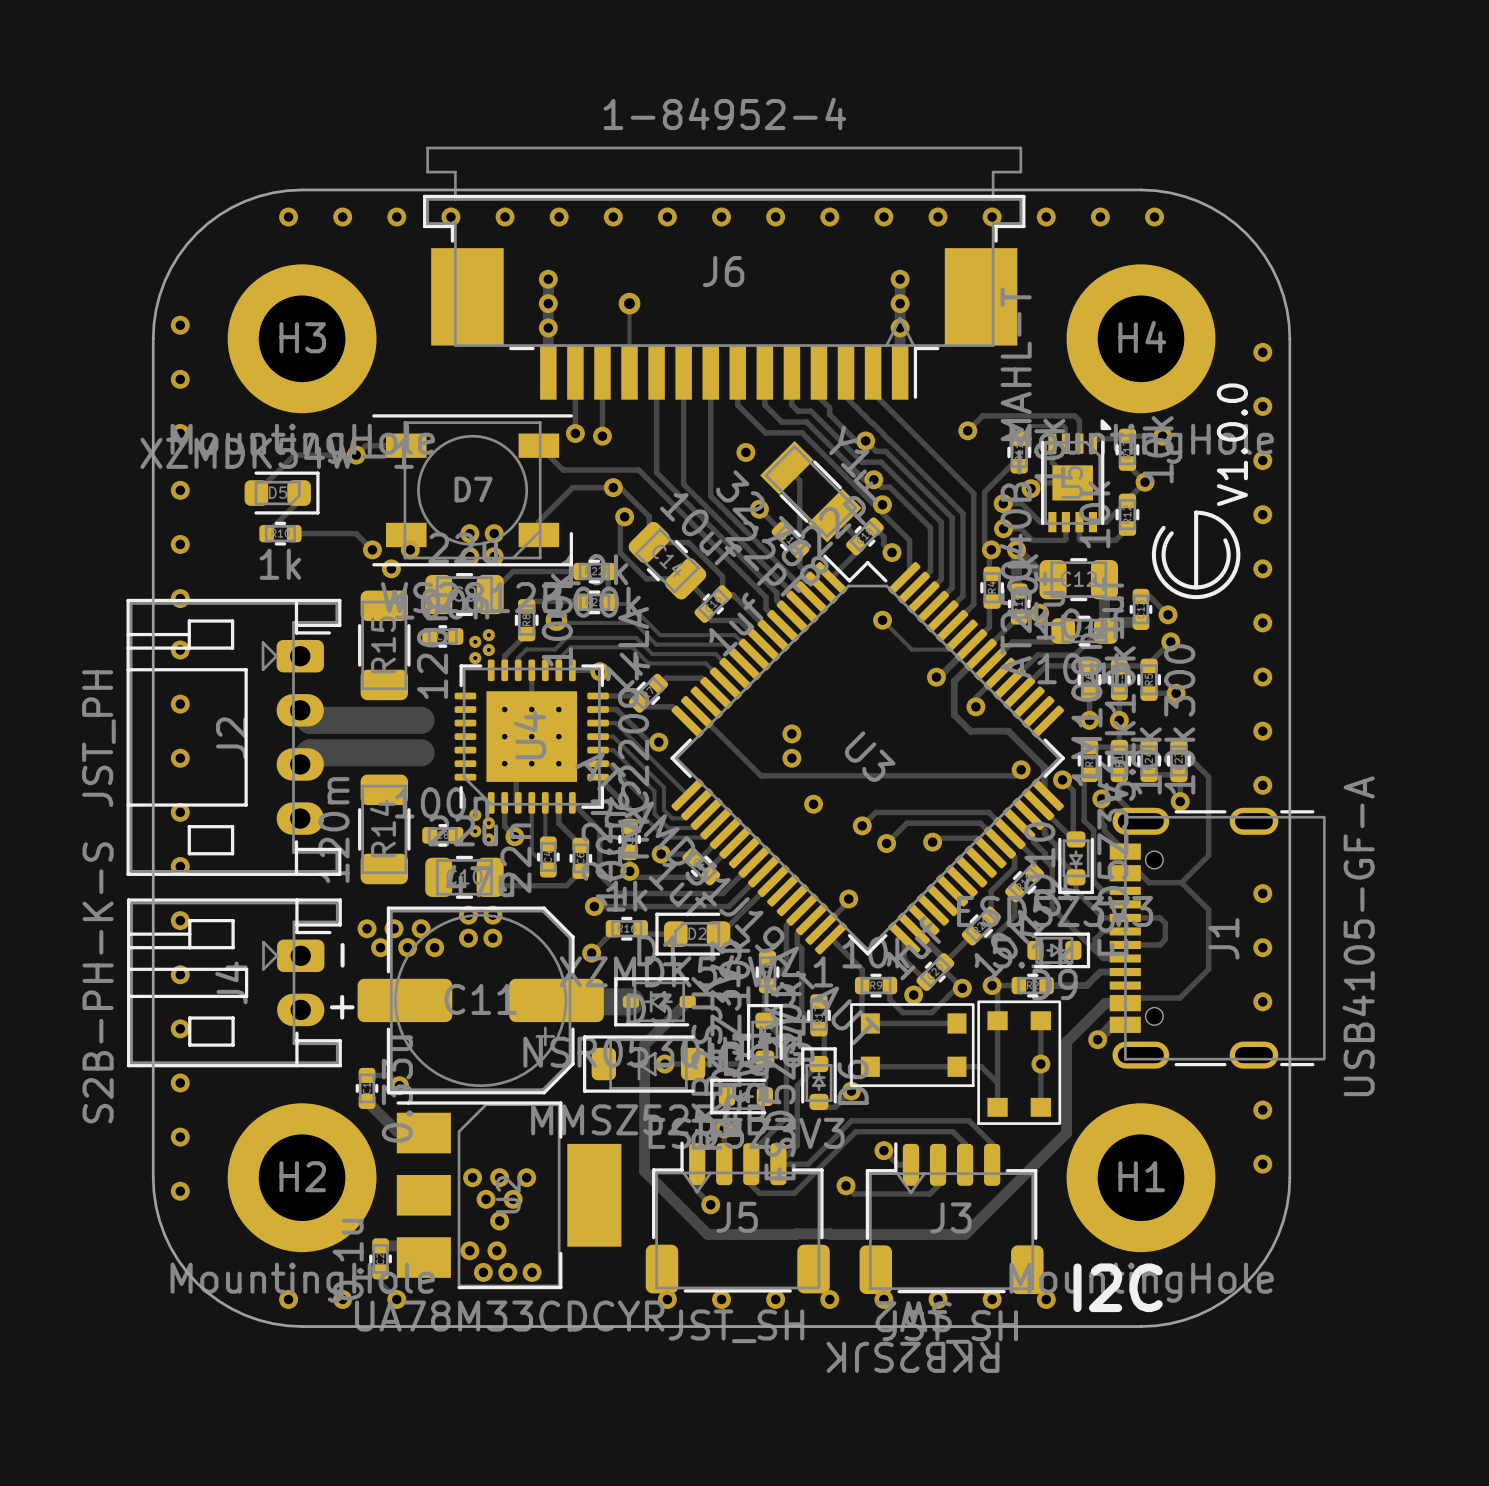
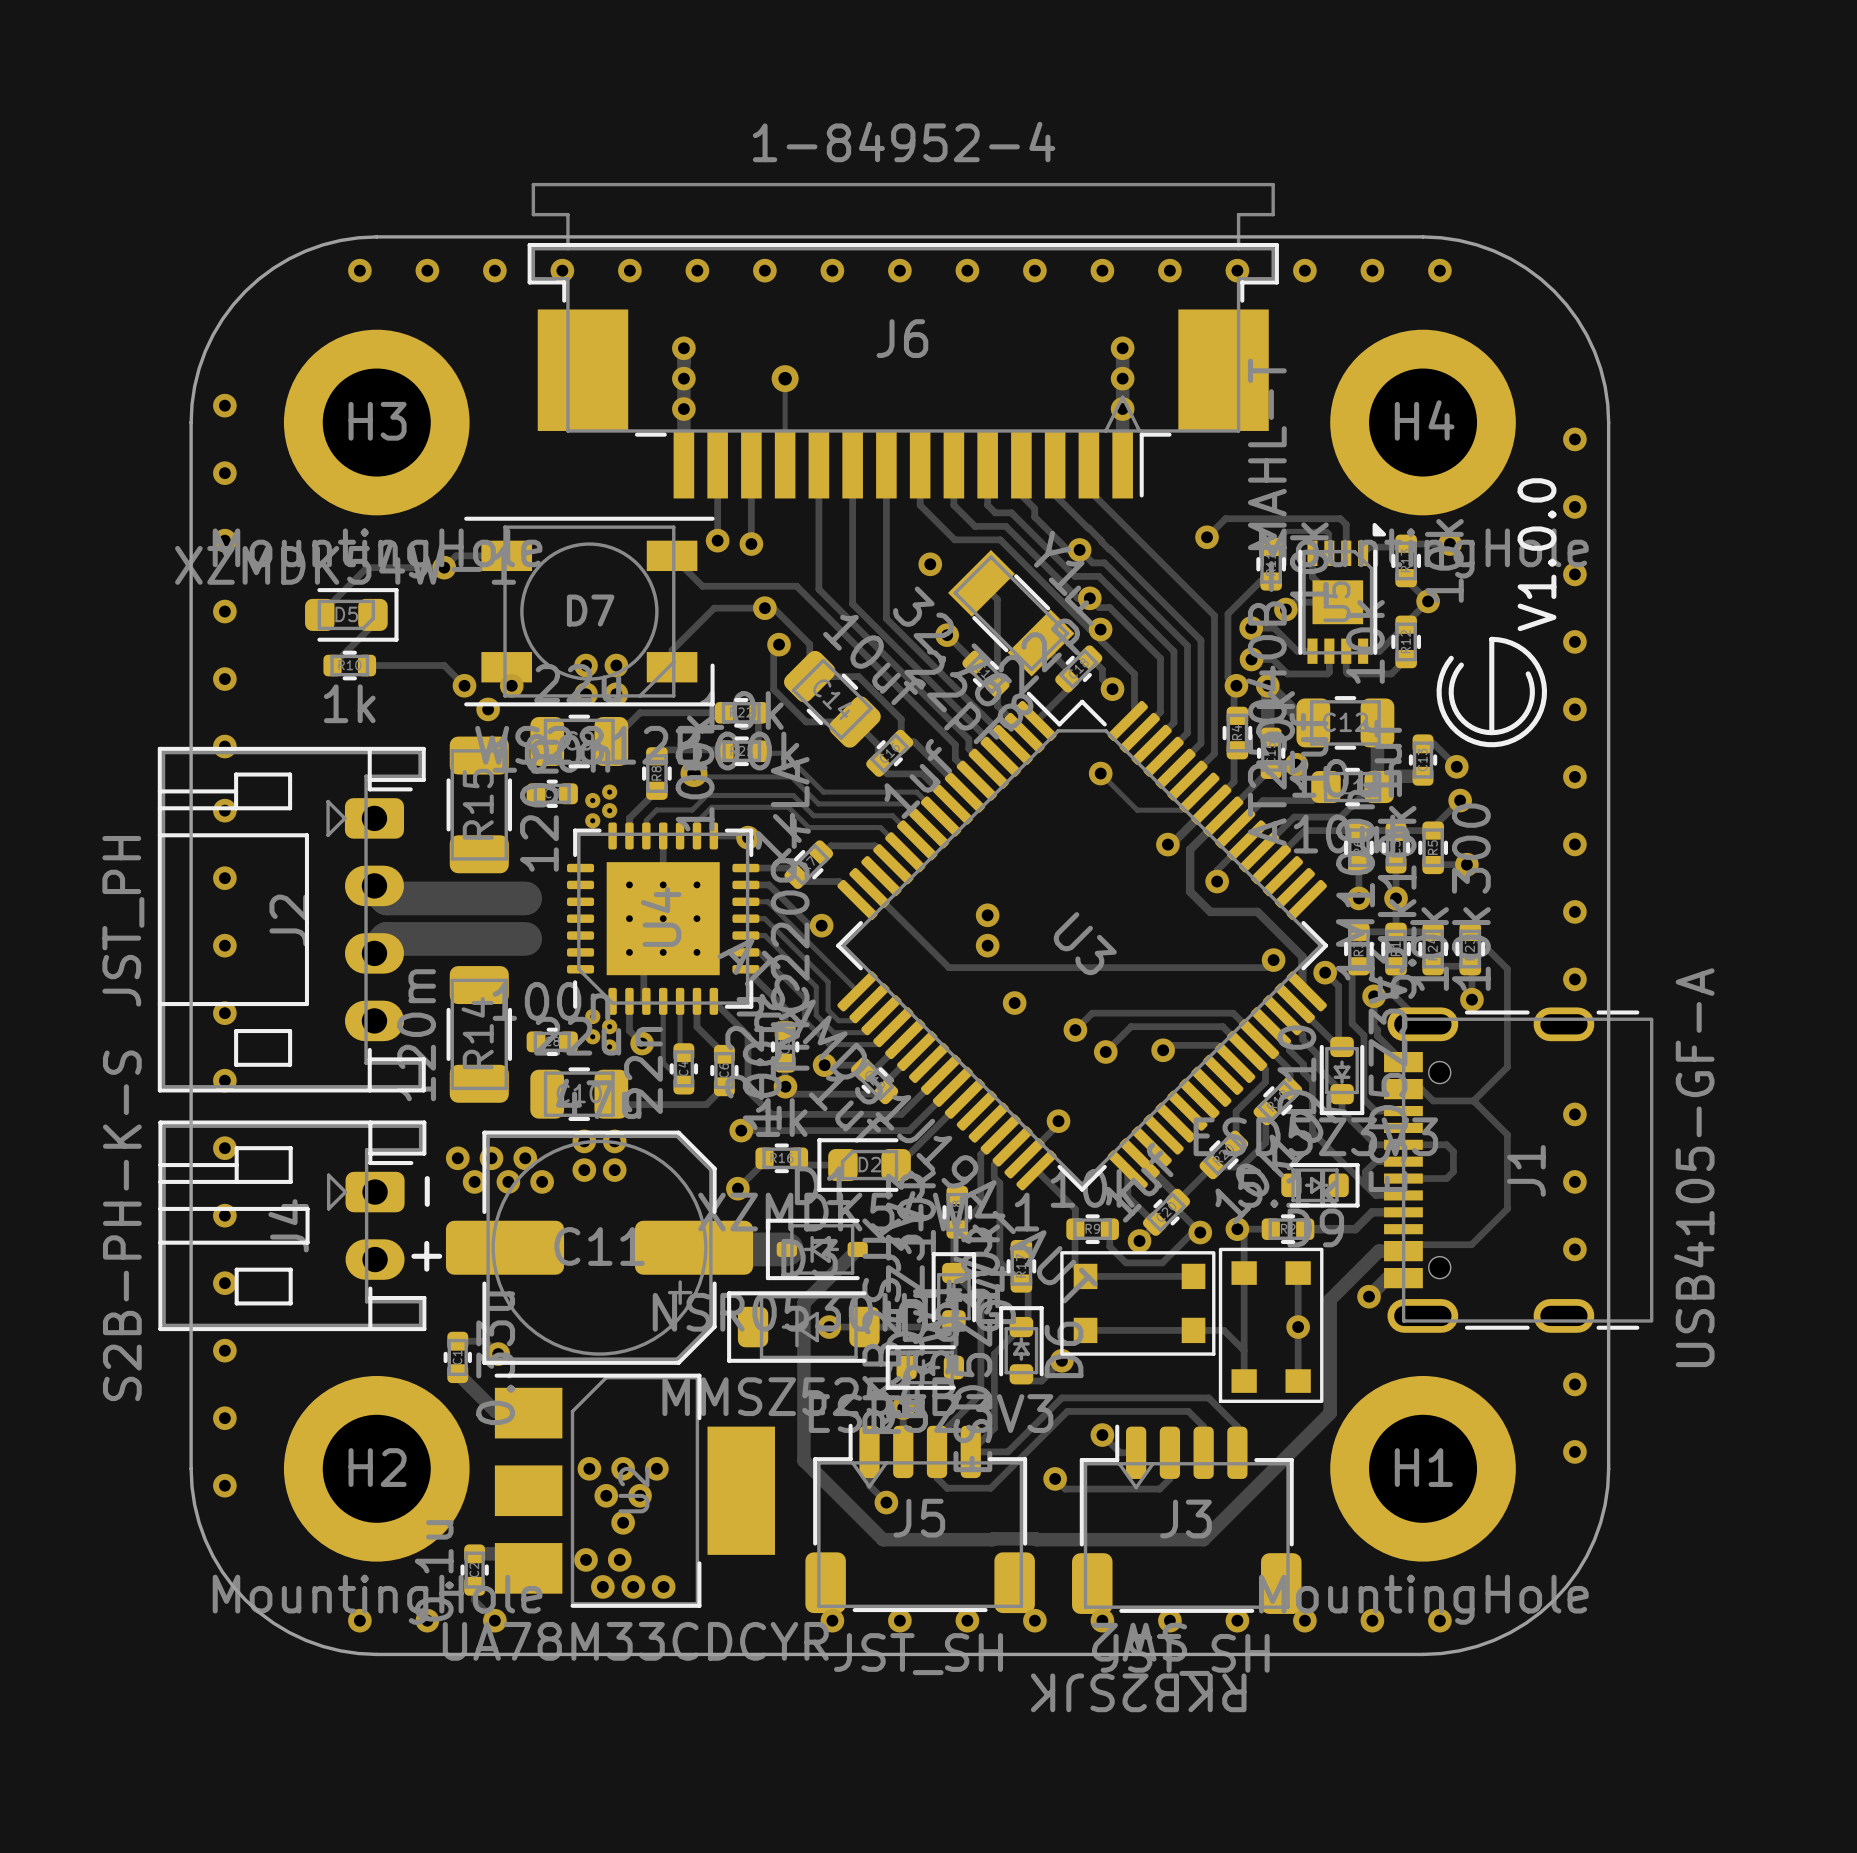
text: I2C (1118, 1287) -> none
via: none -> (1372, 1620)
via: none -> (1439, 1620)

